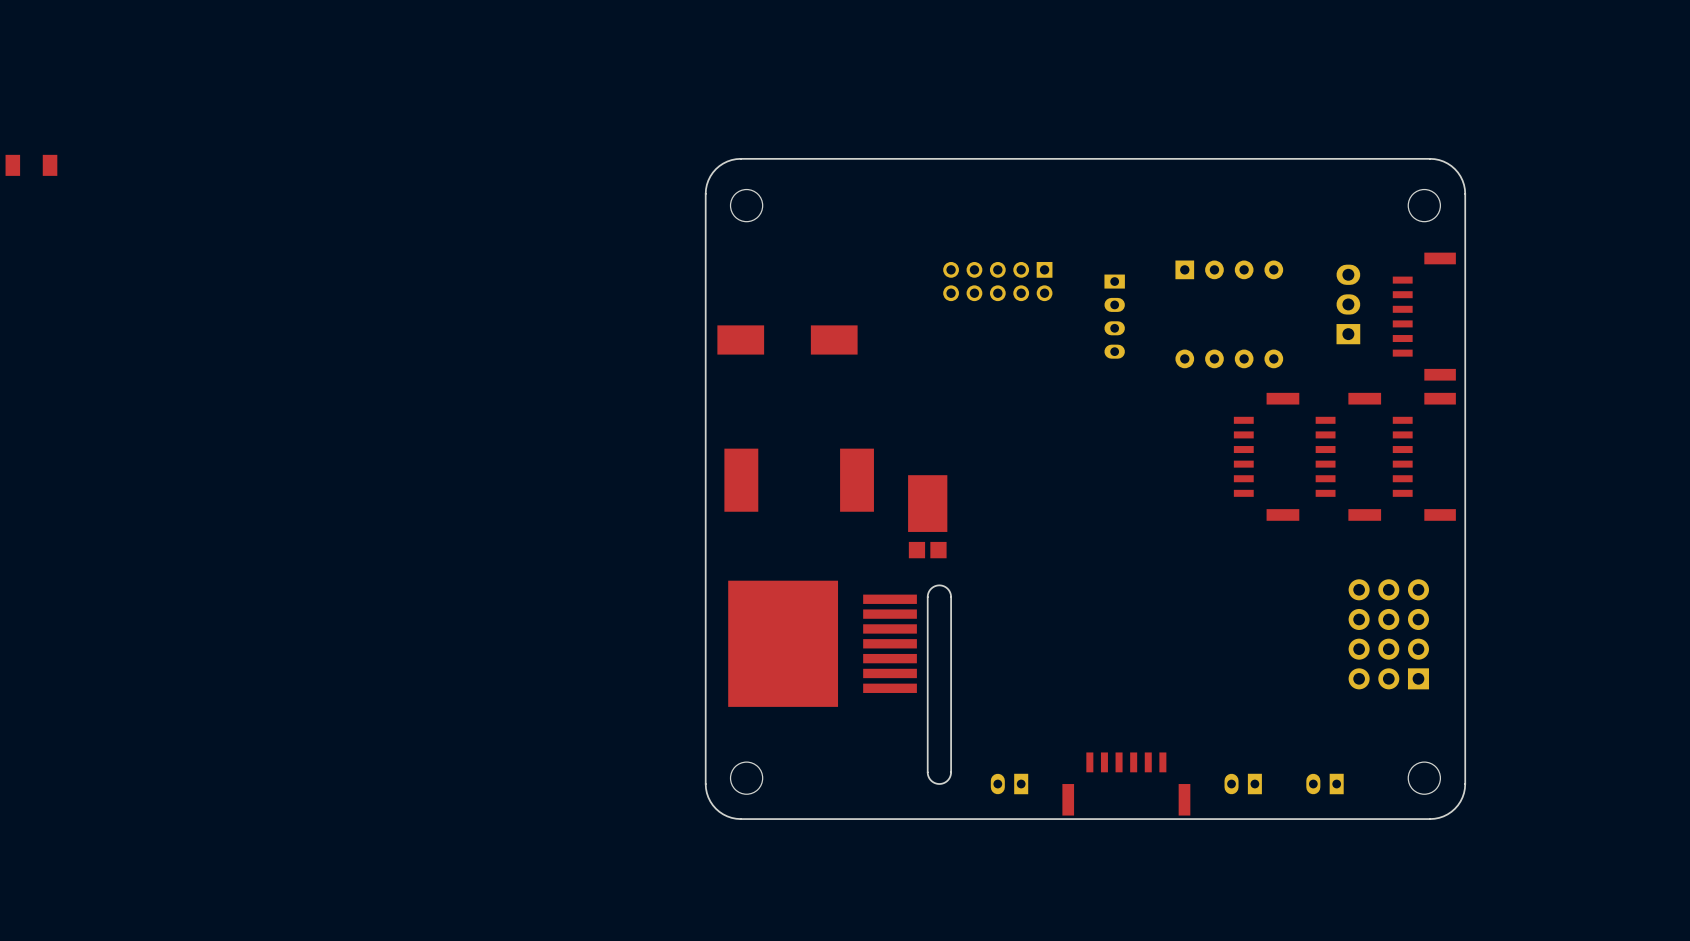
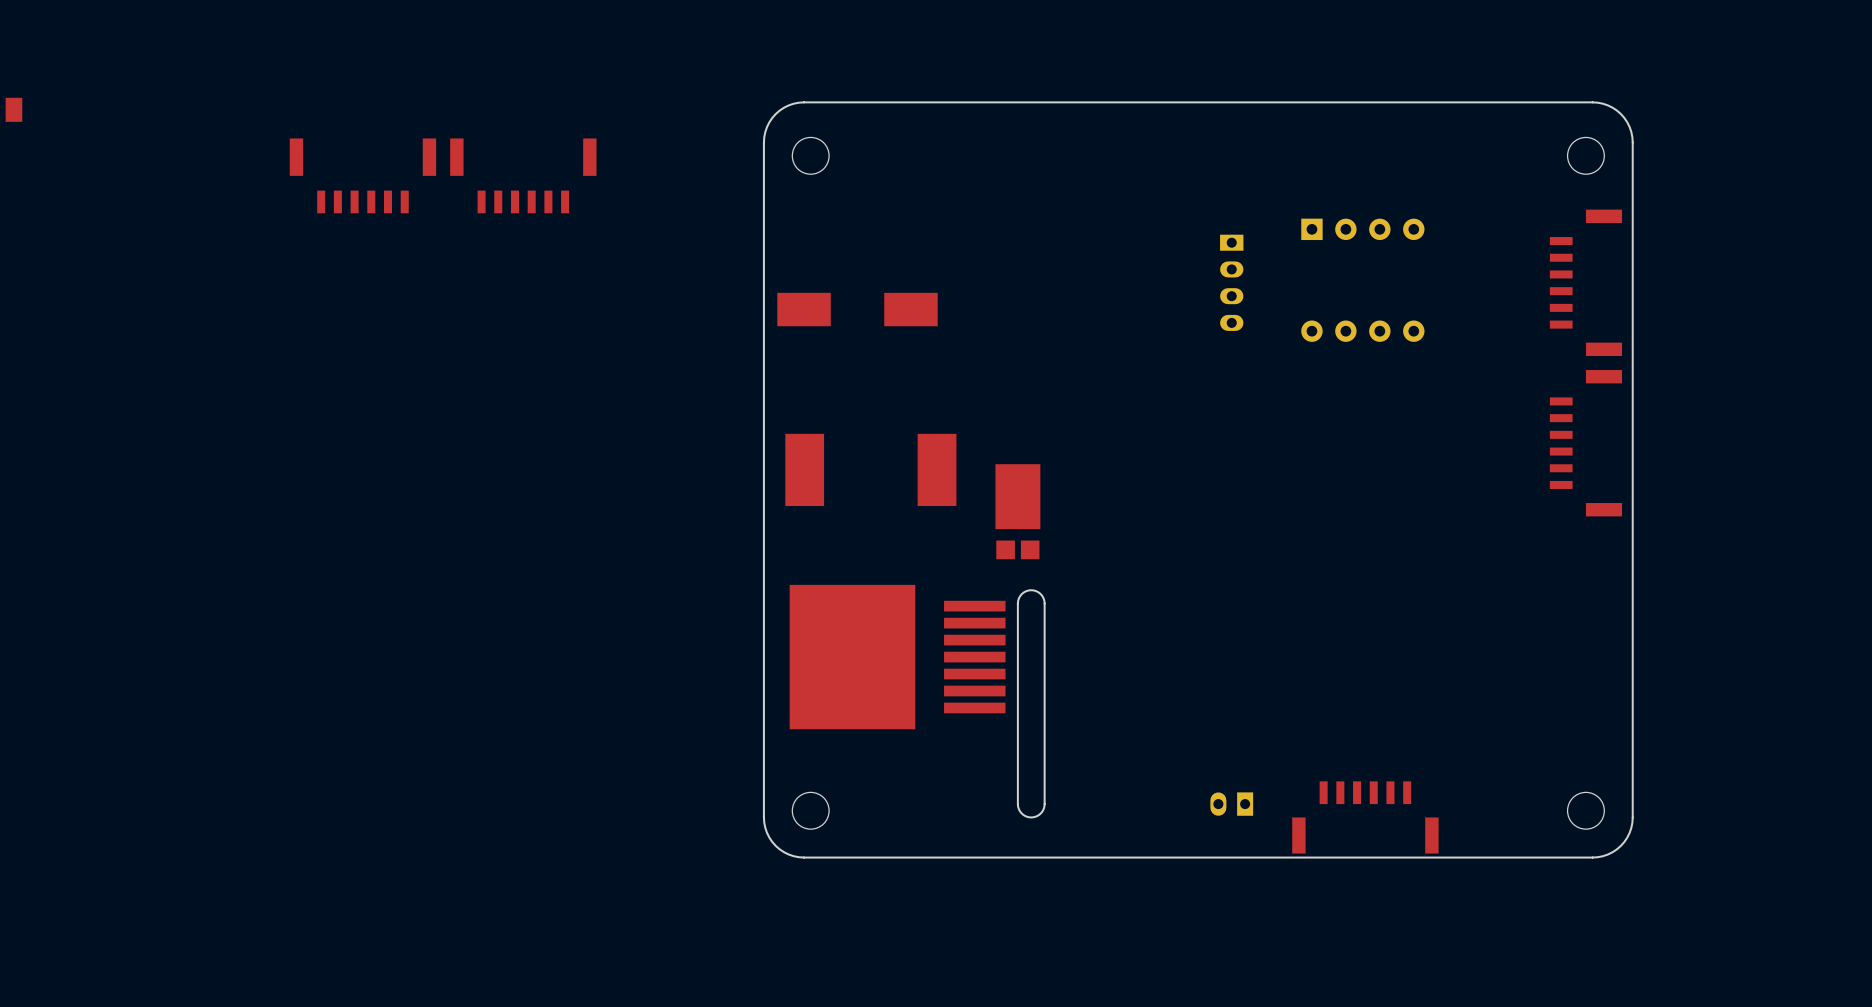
part: none -> (362, 175)
part: none -> (523, 175)
part: (997, 281) -> none
part: (1348, 304) -> none
part: (1266, 456) -> none
part: (1348, 456) -> none
part: (1388, 634) -> none
part: none -> (1231, 804)
part footprint: [1224, 773, 1262, 795] -> [1292, 781, 1439, 854]
part: (1009, 784) -> none
part: (1126, 784) -> none
part: (1325, 784) -> none

